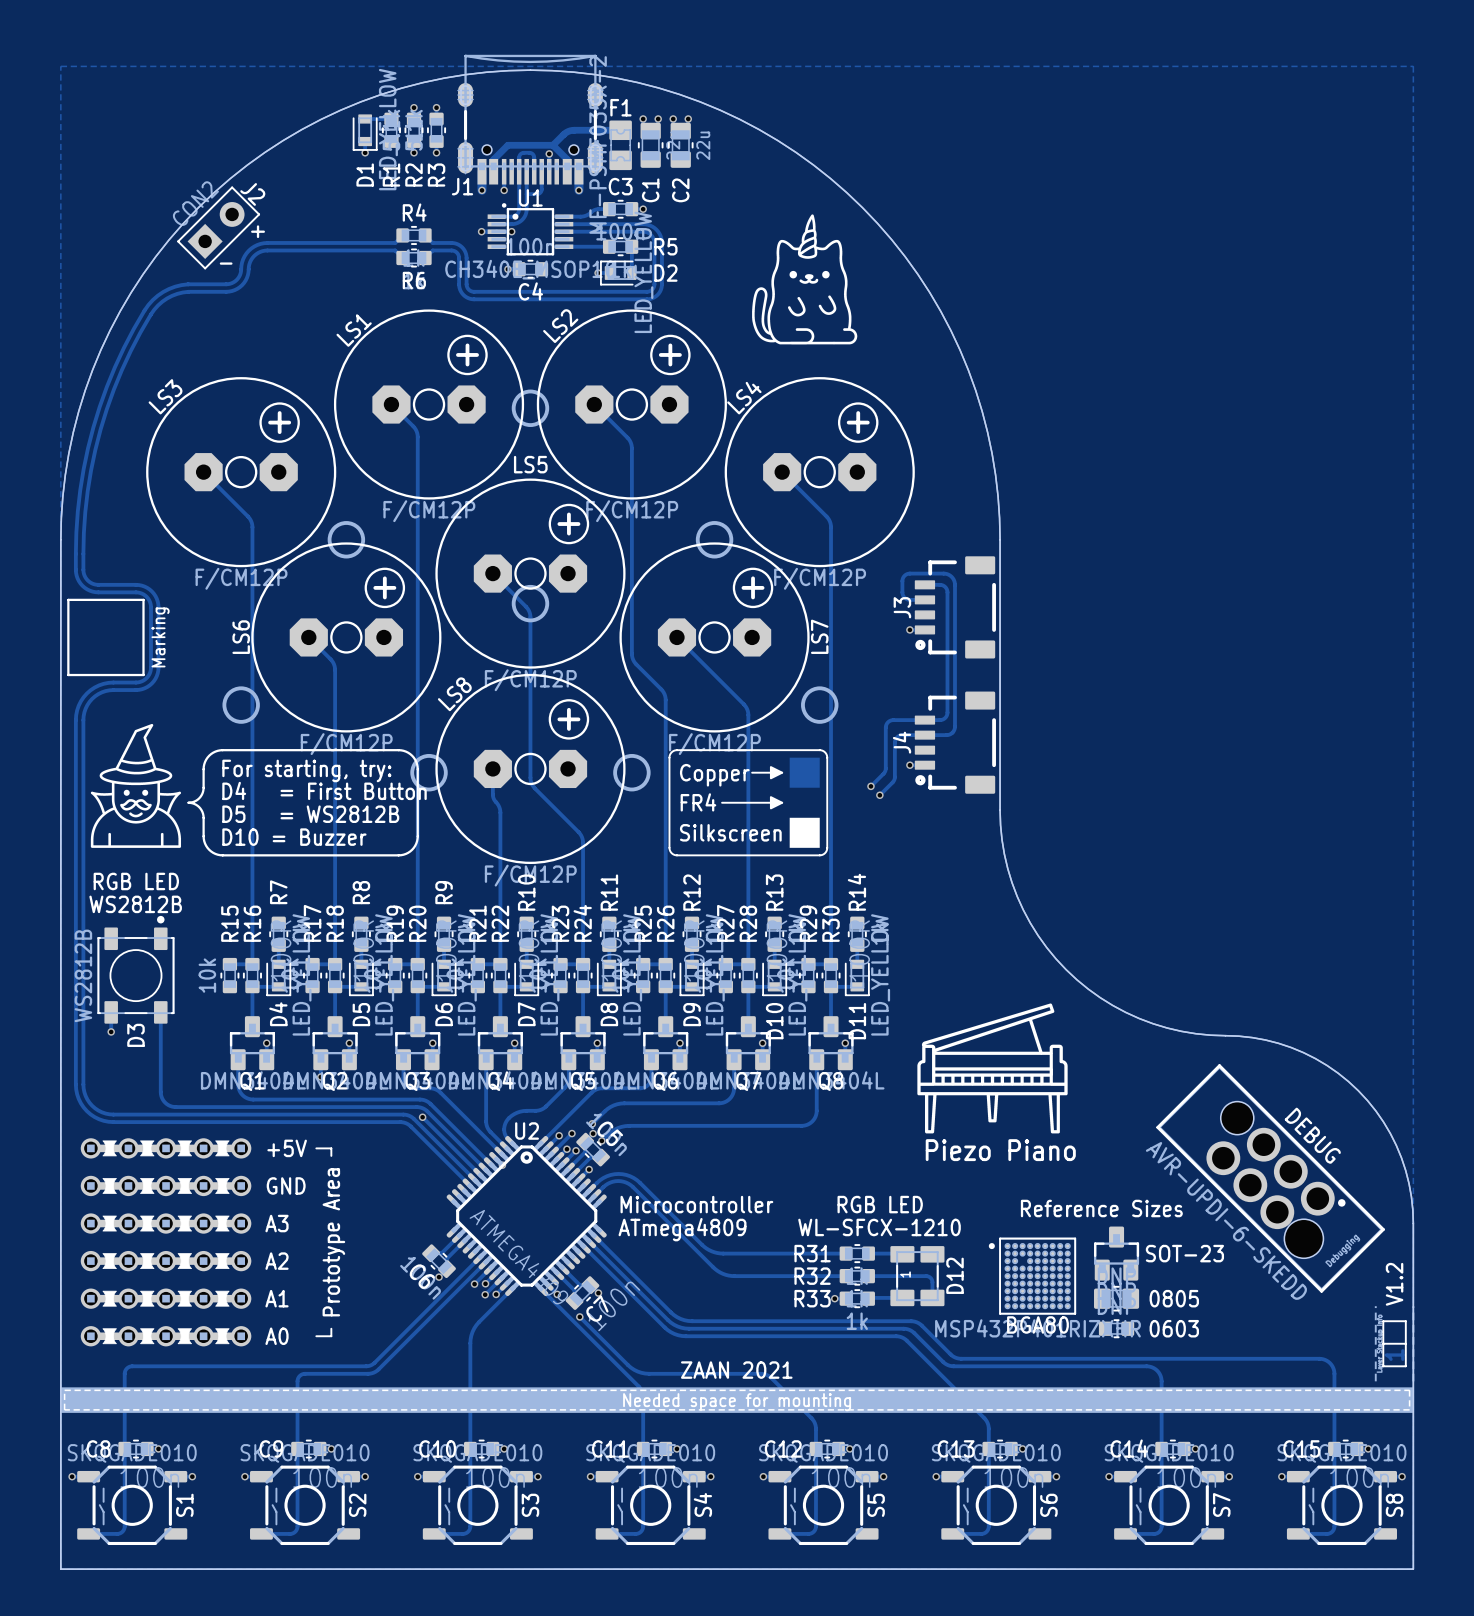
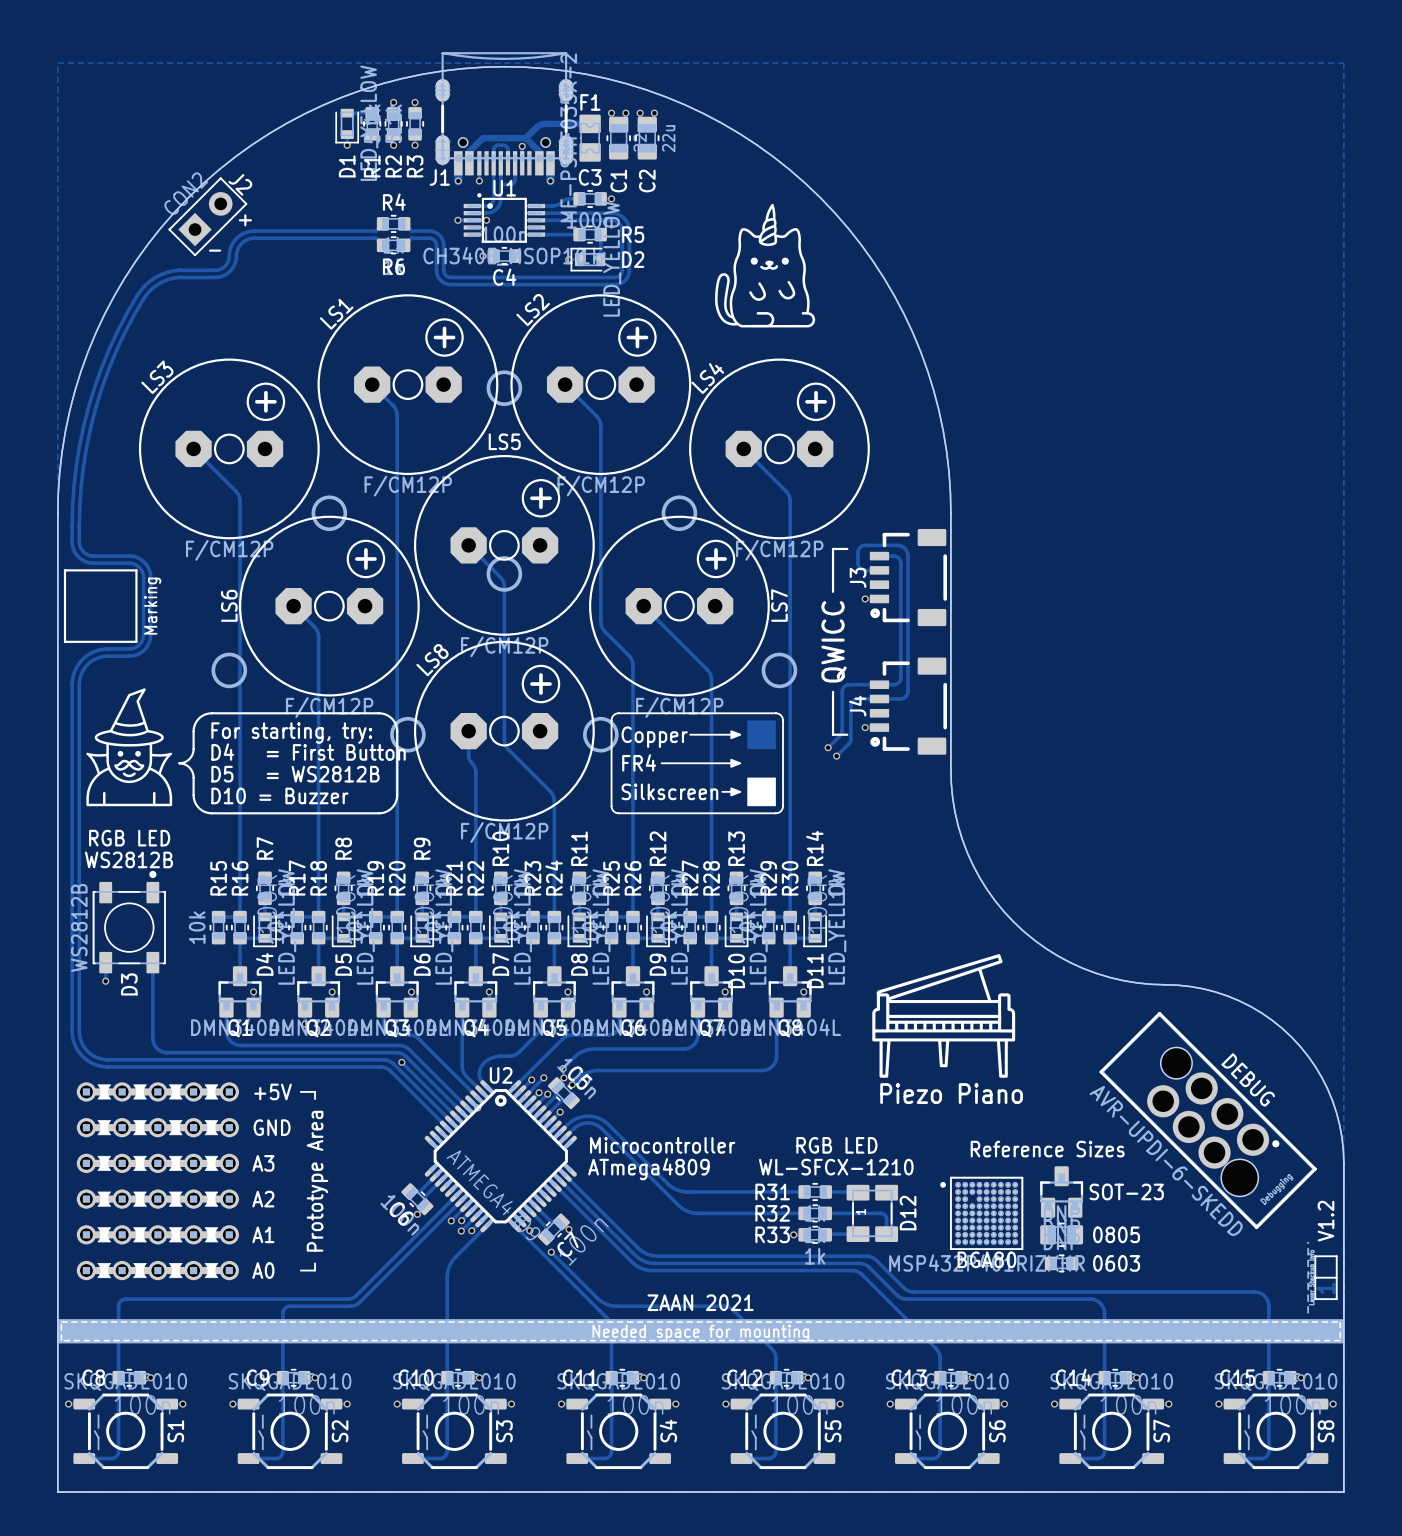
line: none -> (847, 548) (833, 548) (833, 591)
text: none -> QWICC (834, 641)
line: none -> (833, 691) (833, 734) (847, 734)
drawing shape: [668, 749, 829, 857] -> [610, 712, 784, 815]

